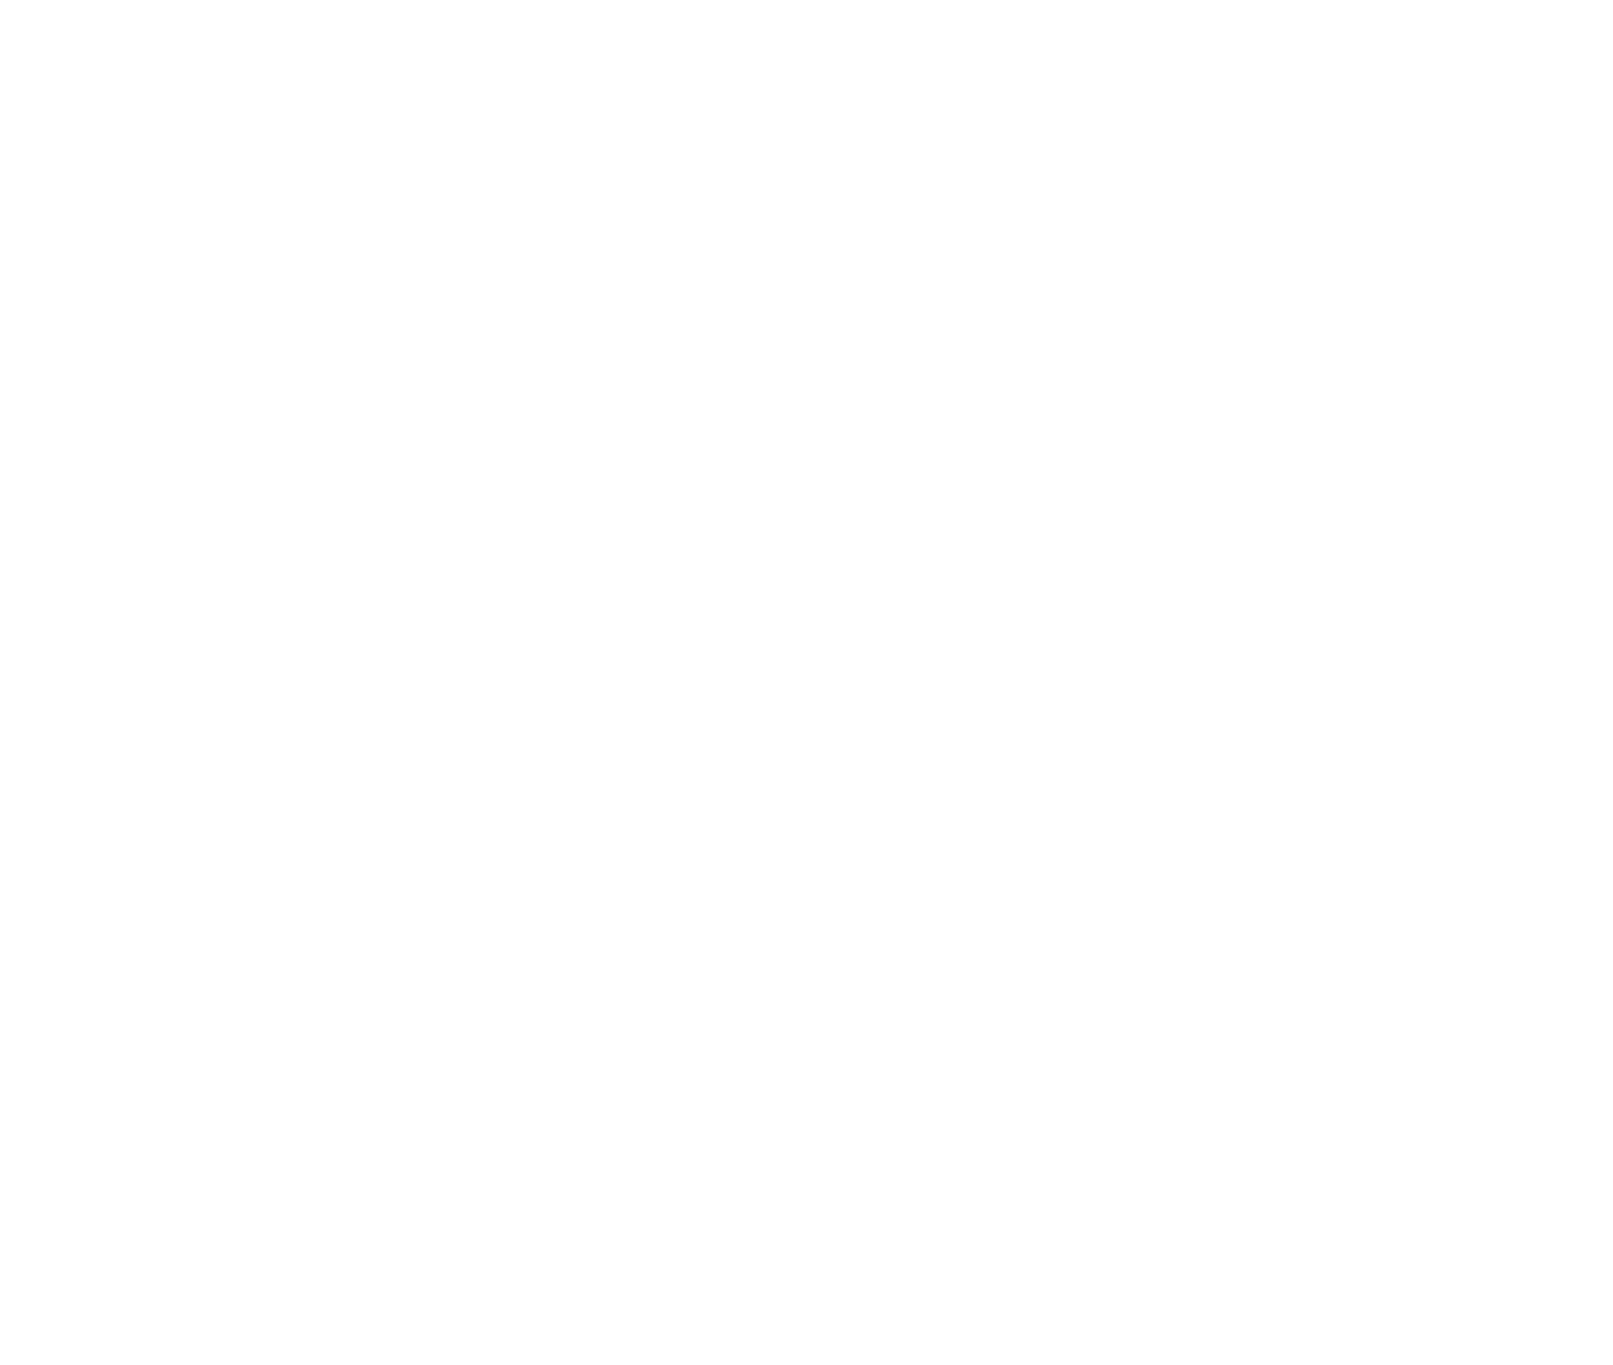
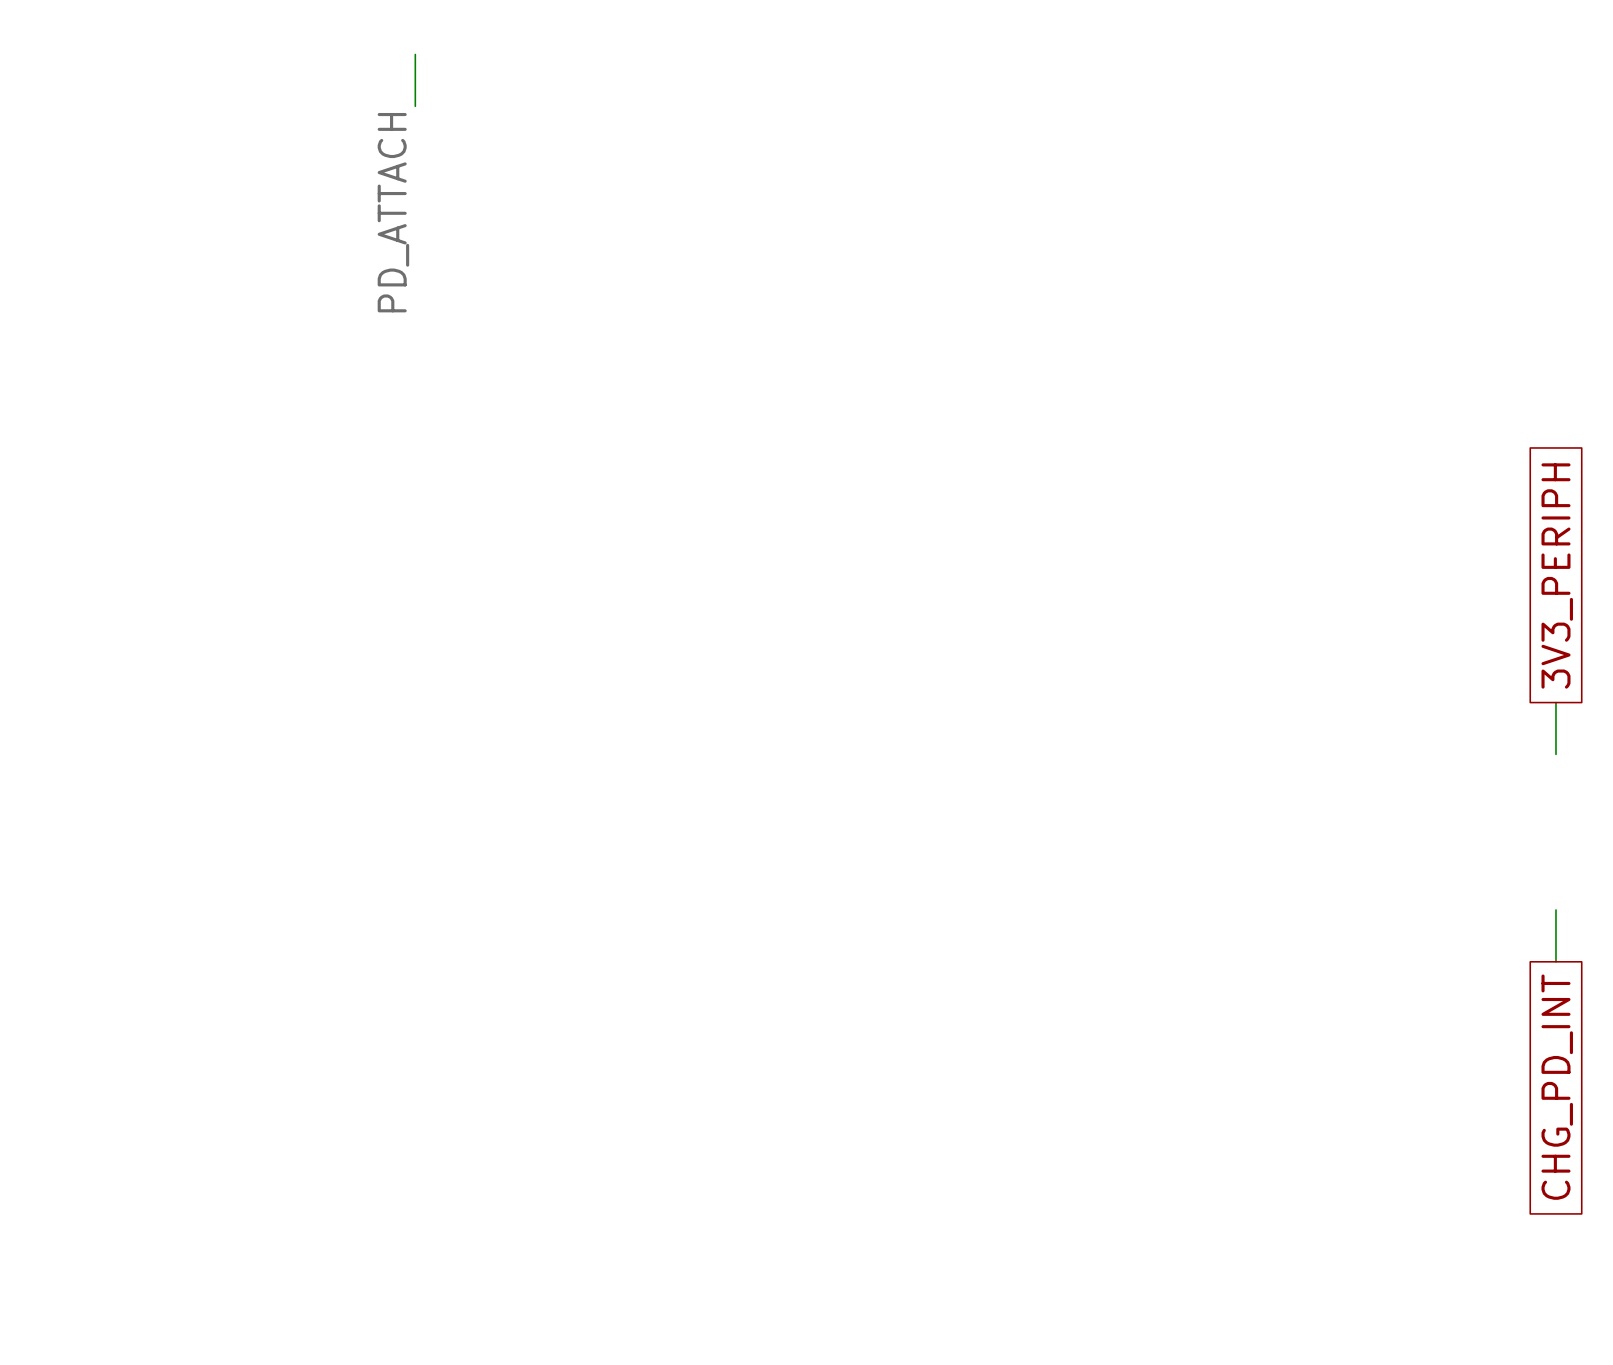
wire: none -> (415, 54) (415, 106)
label: none -> PD_ATTACH (393, 212)
global label: none -> 3V3_PERIPH (1557, 575)
wire: none -> (1555, 702) (1555, 754)
wire: none -> (1555, 909) (1555, 961)
global label: none -> CHG_PD_INT (1557, 1087)

